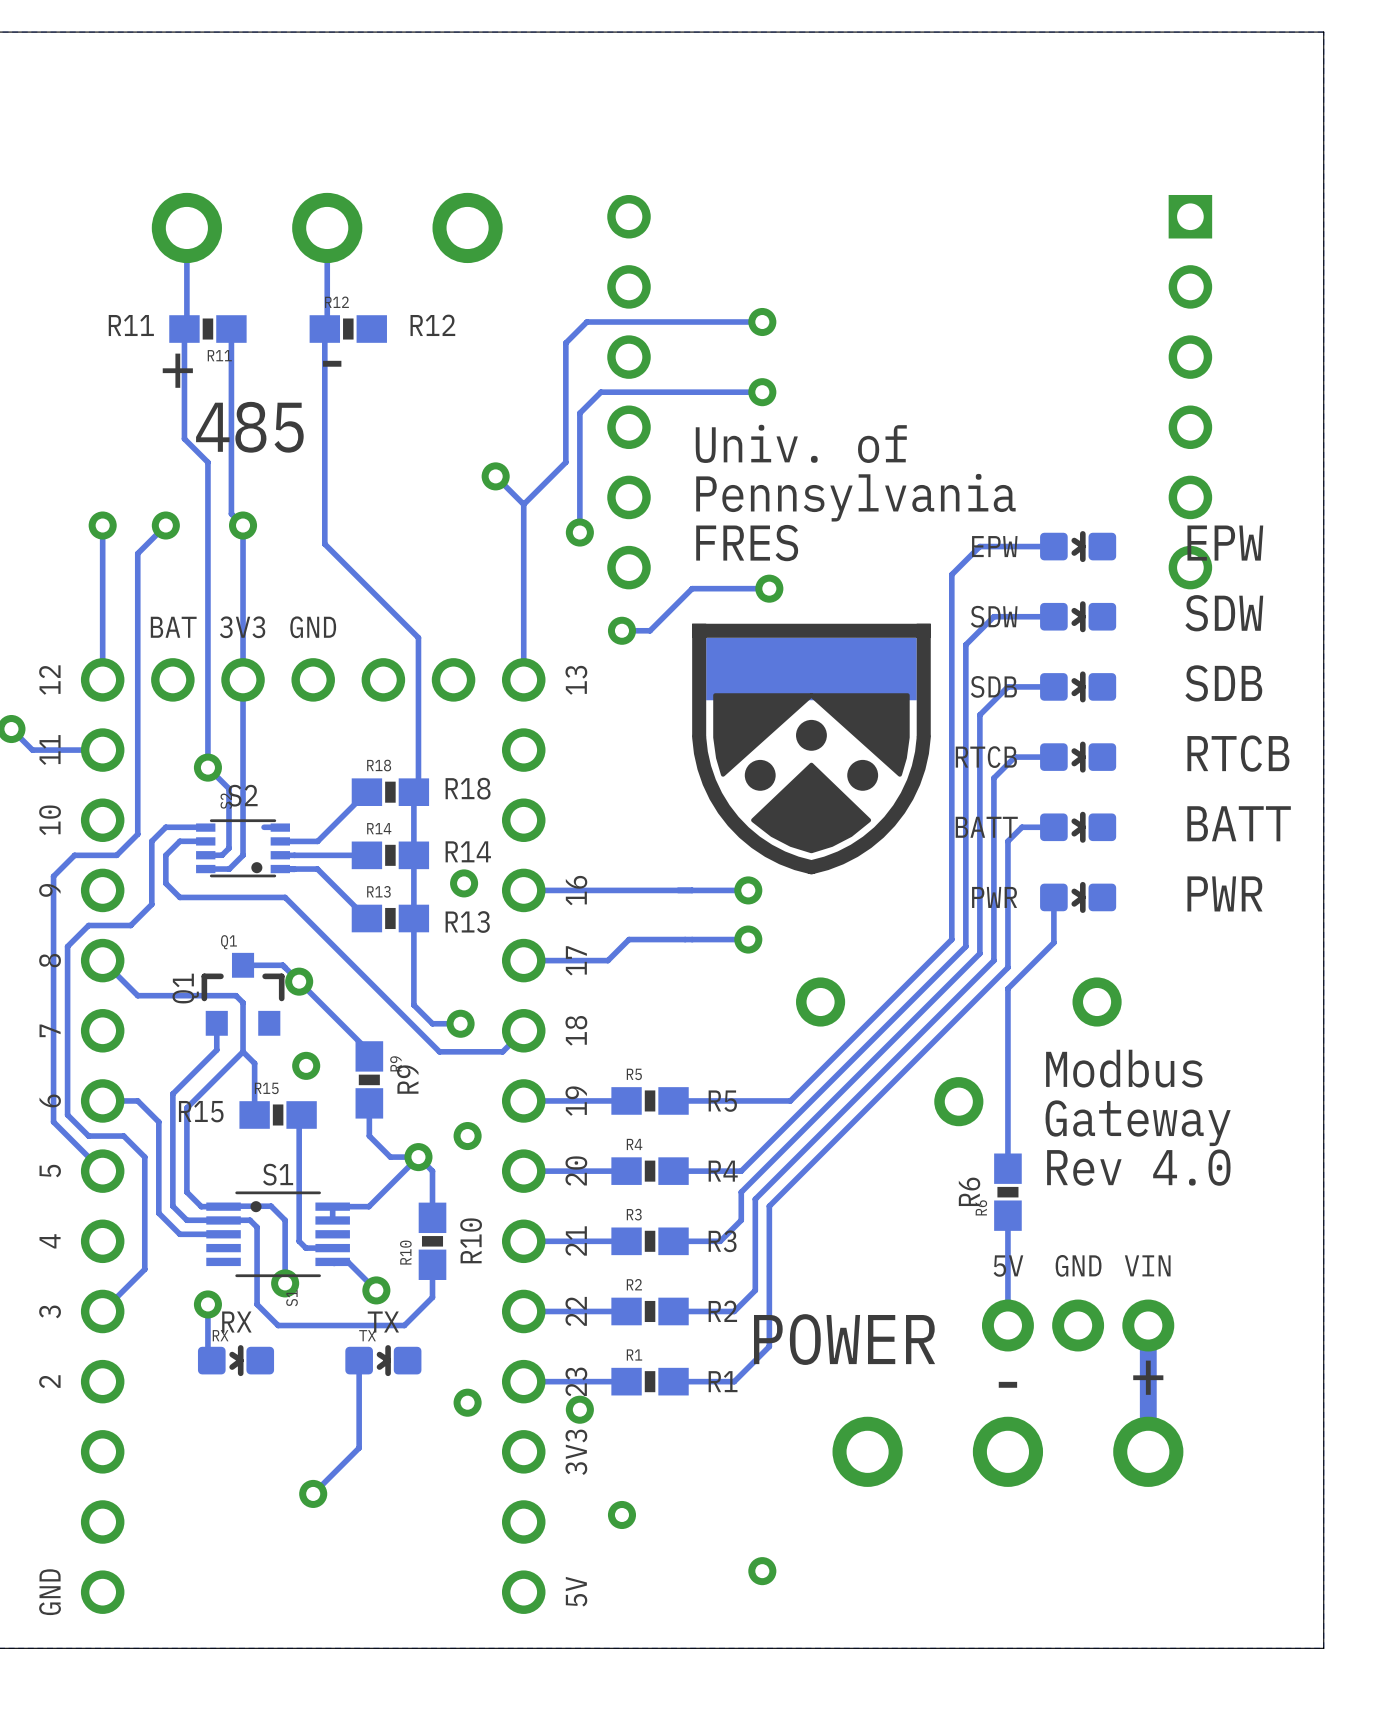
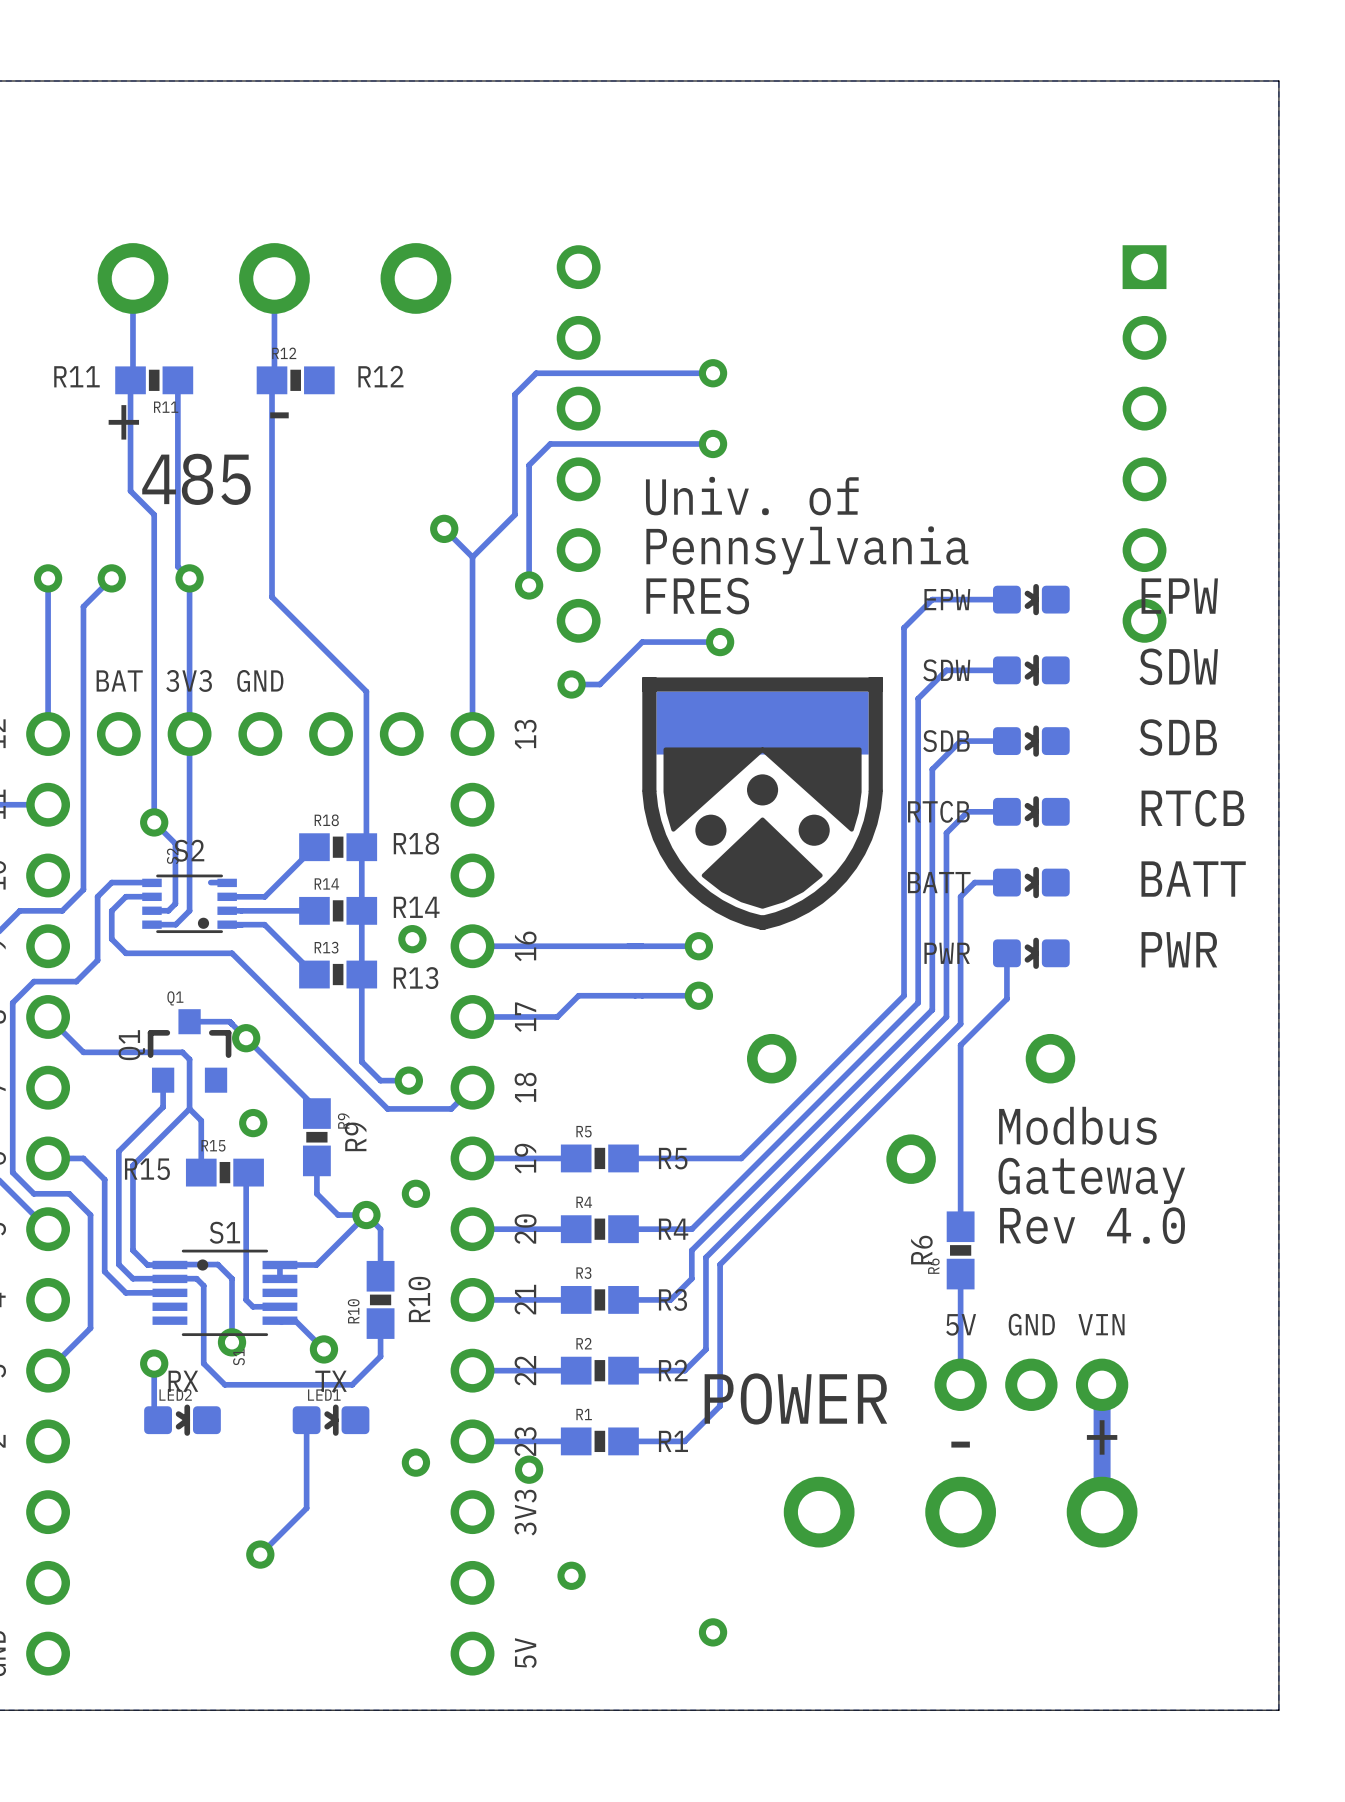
RX name: RX (220, 1335) -> LED2 (175, 1394)
TX name: TX (367, 1335) -> LED1 (324, 1395)

